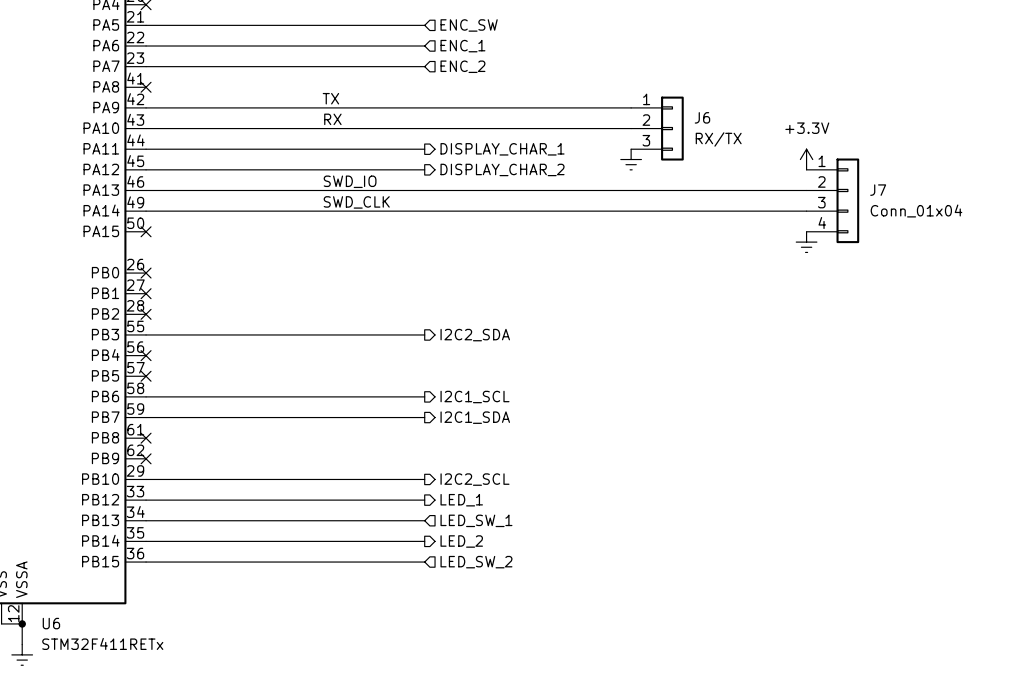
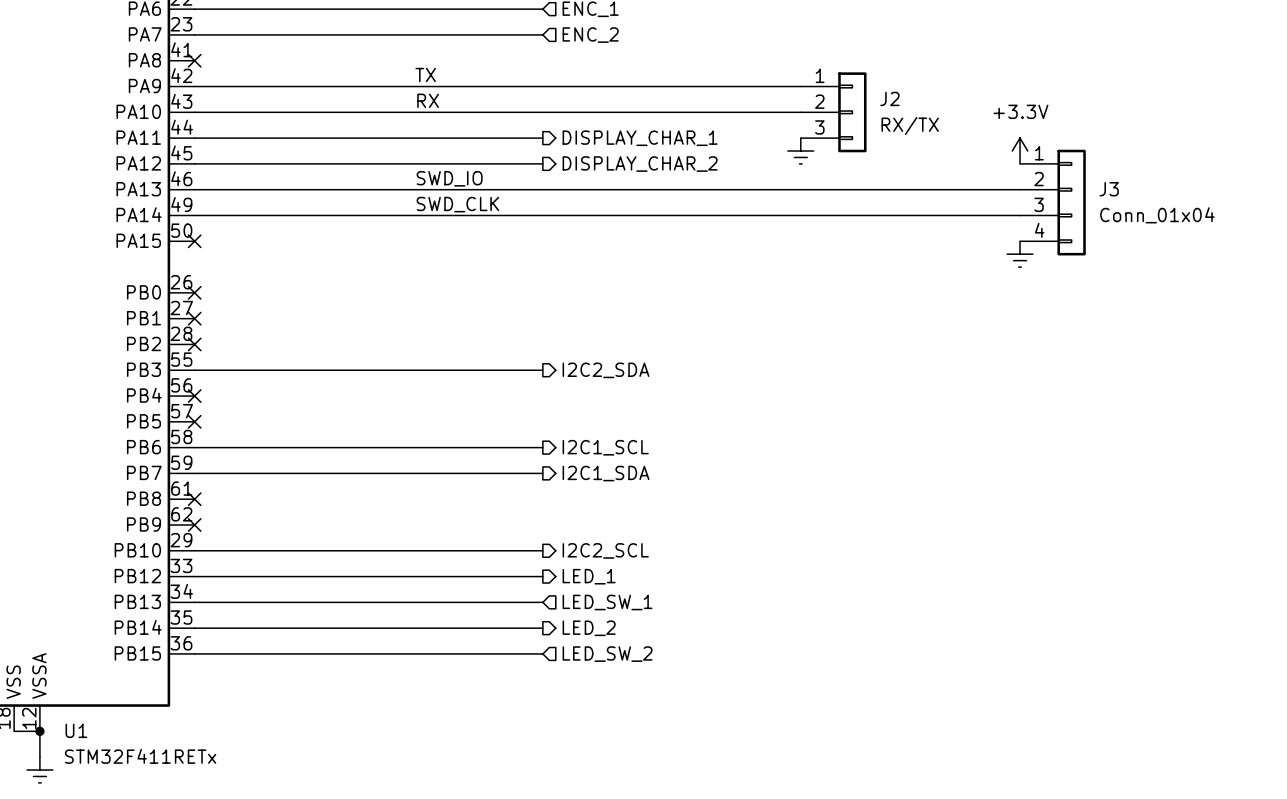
J6 name: J6 (702, 117) -> J2 (889, 98)
J7 name: J7 (878, 190) -> J3 (1109, 189)
U6 name: U6 (51, 623) -> U1 (76, 730)

